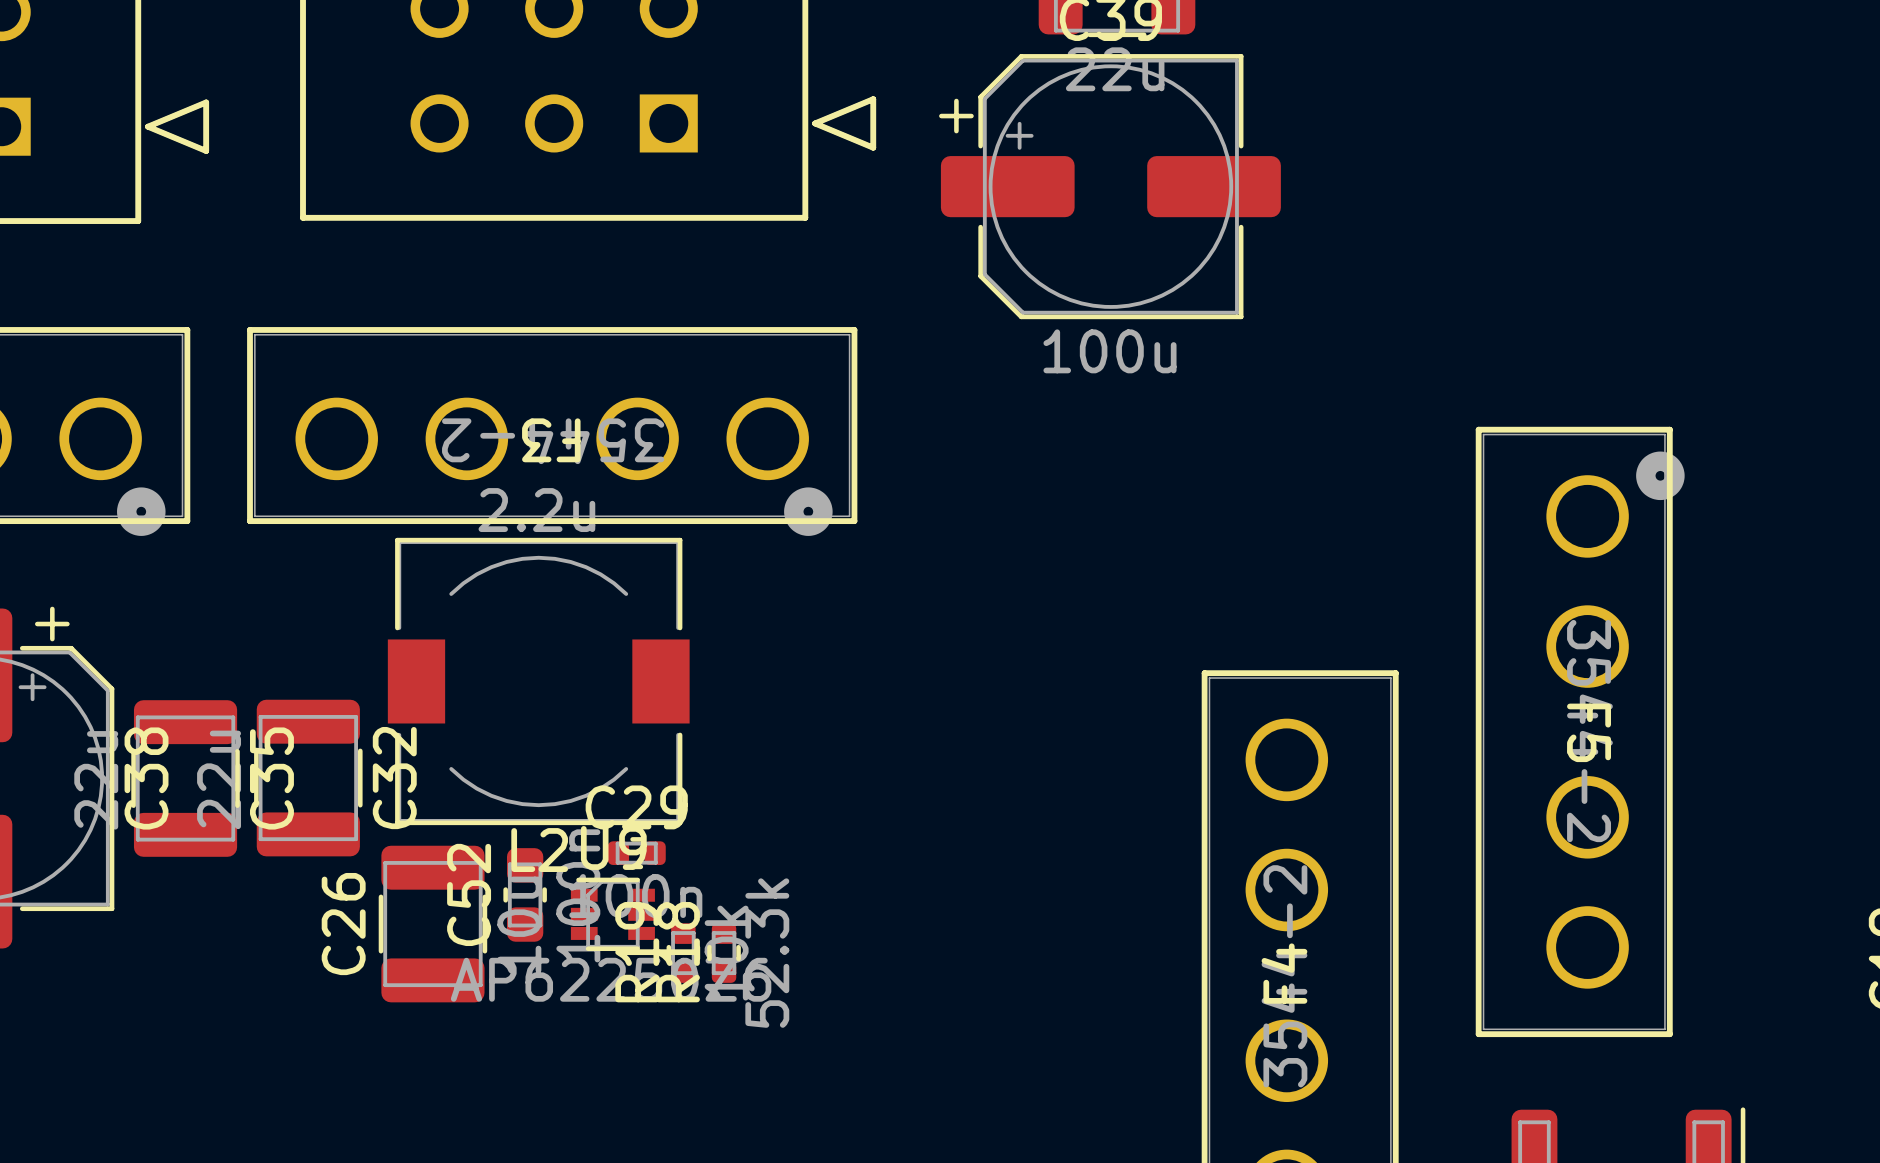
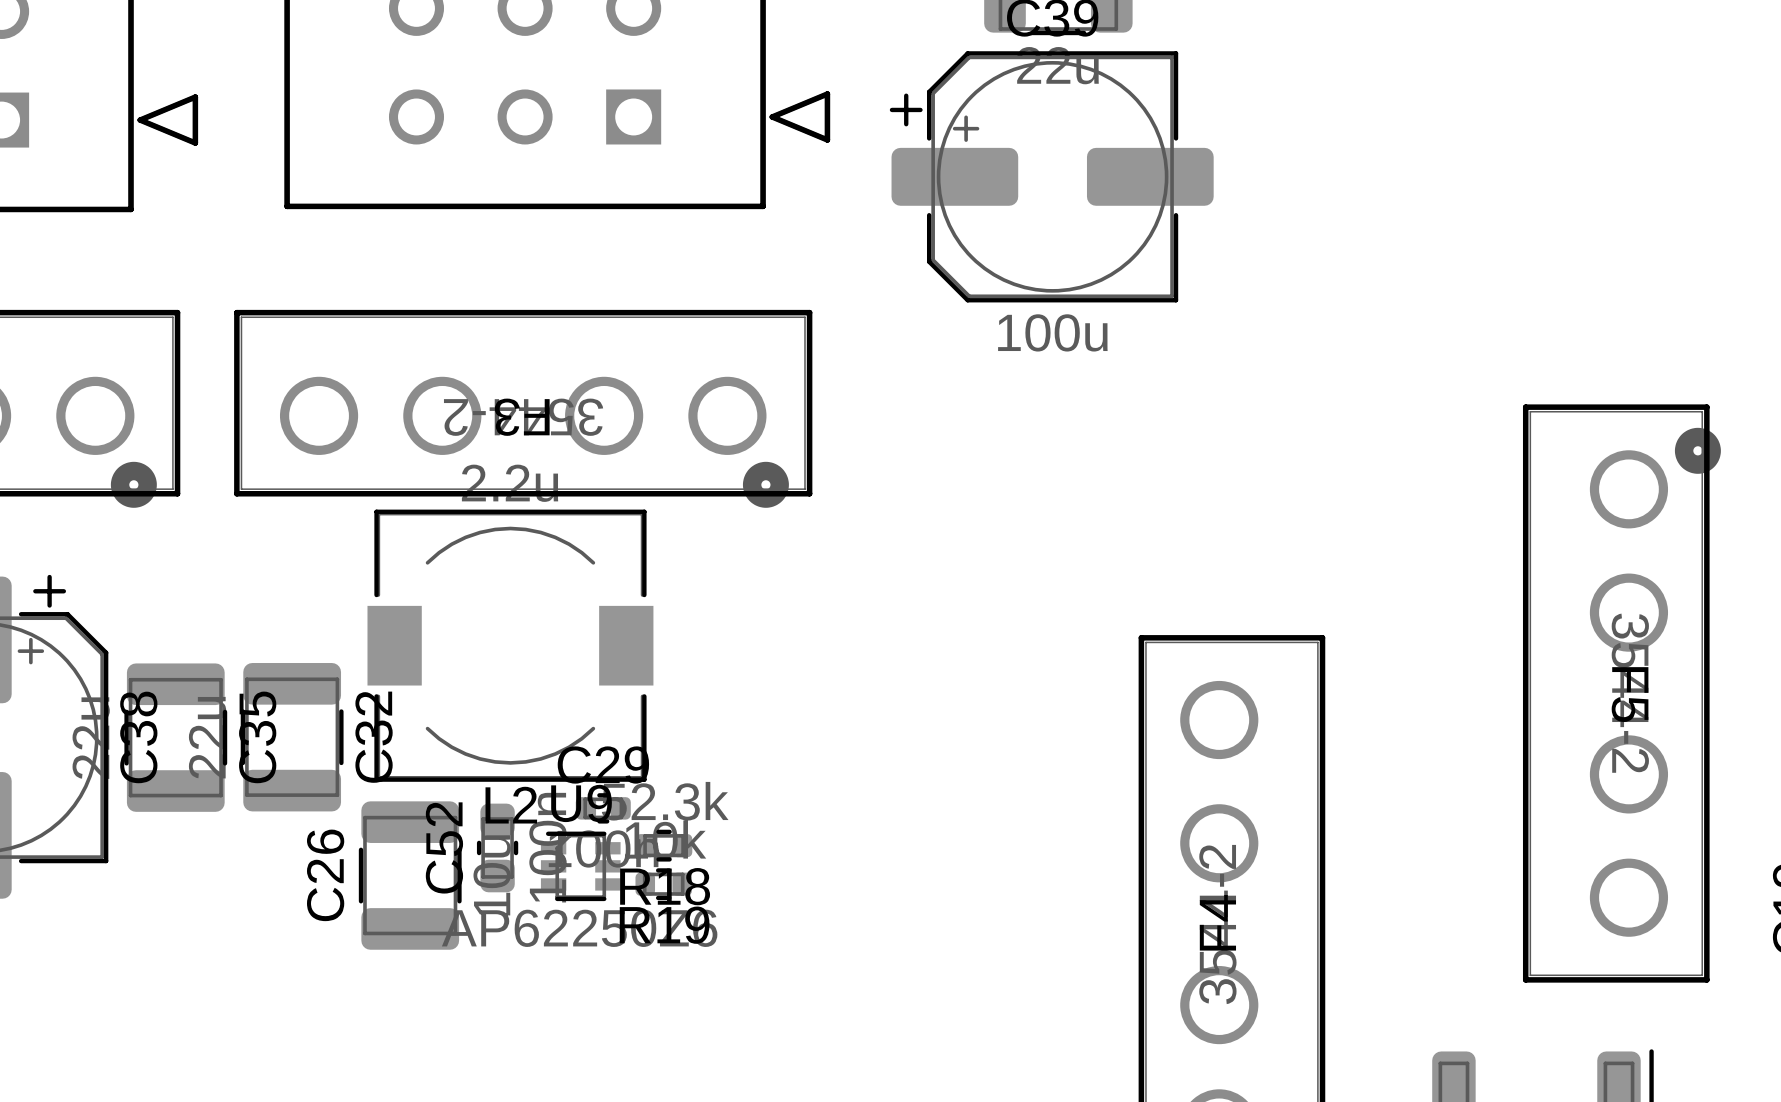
F5 position: (1580, 731) -> (1621, 693)
R19 rotation: 0° (683, 953) -> 90° clockwise (663, 884)
R18 rotation: 0° (724, 953) -> 90° clockwise (664, 845)
R18 position: (724, 953) -> (664, 845)

